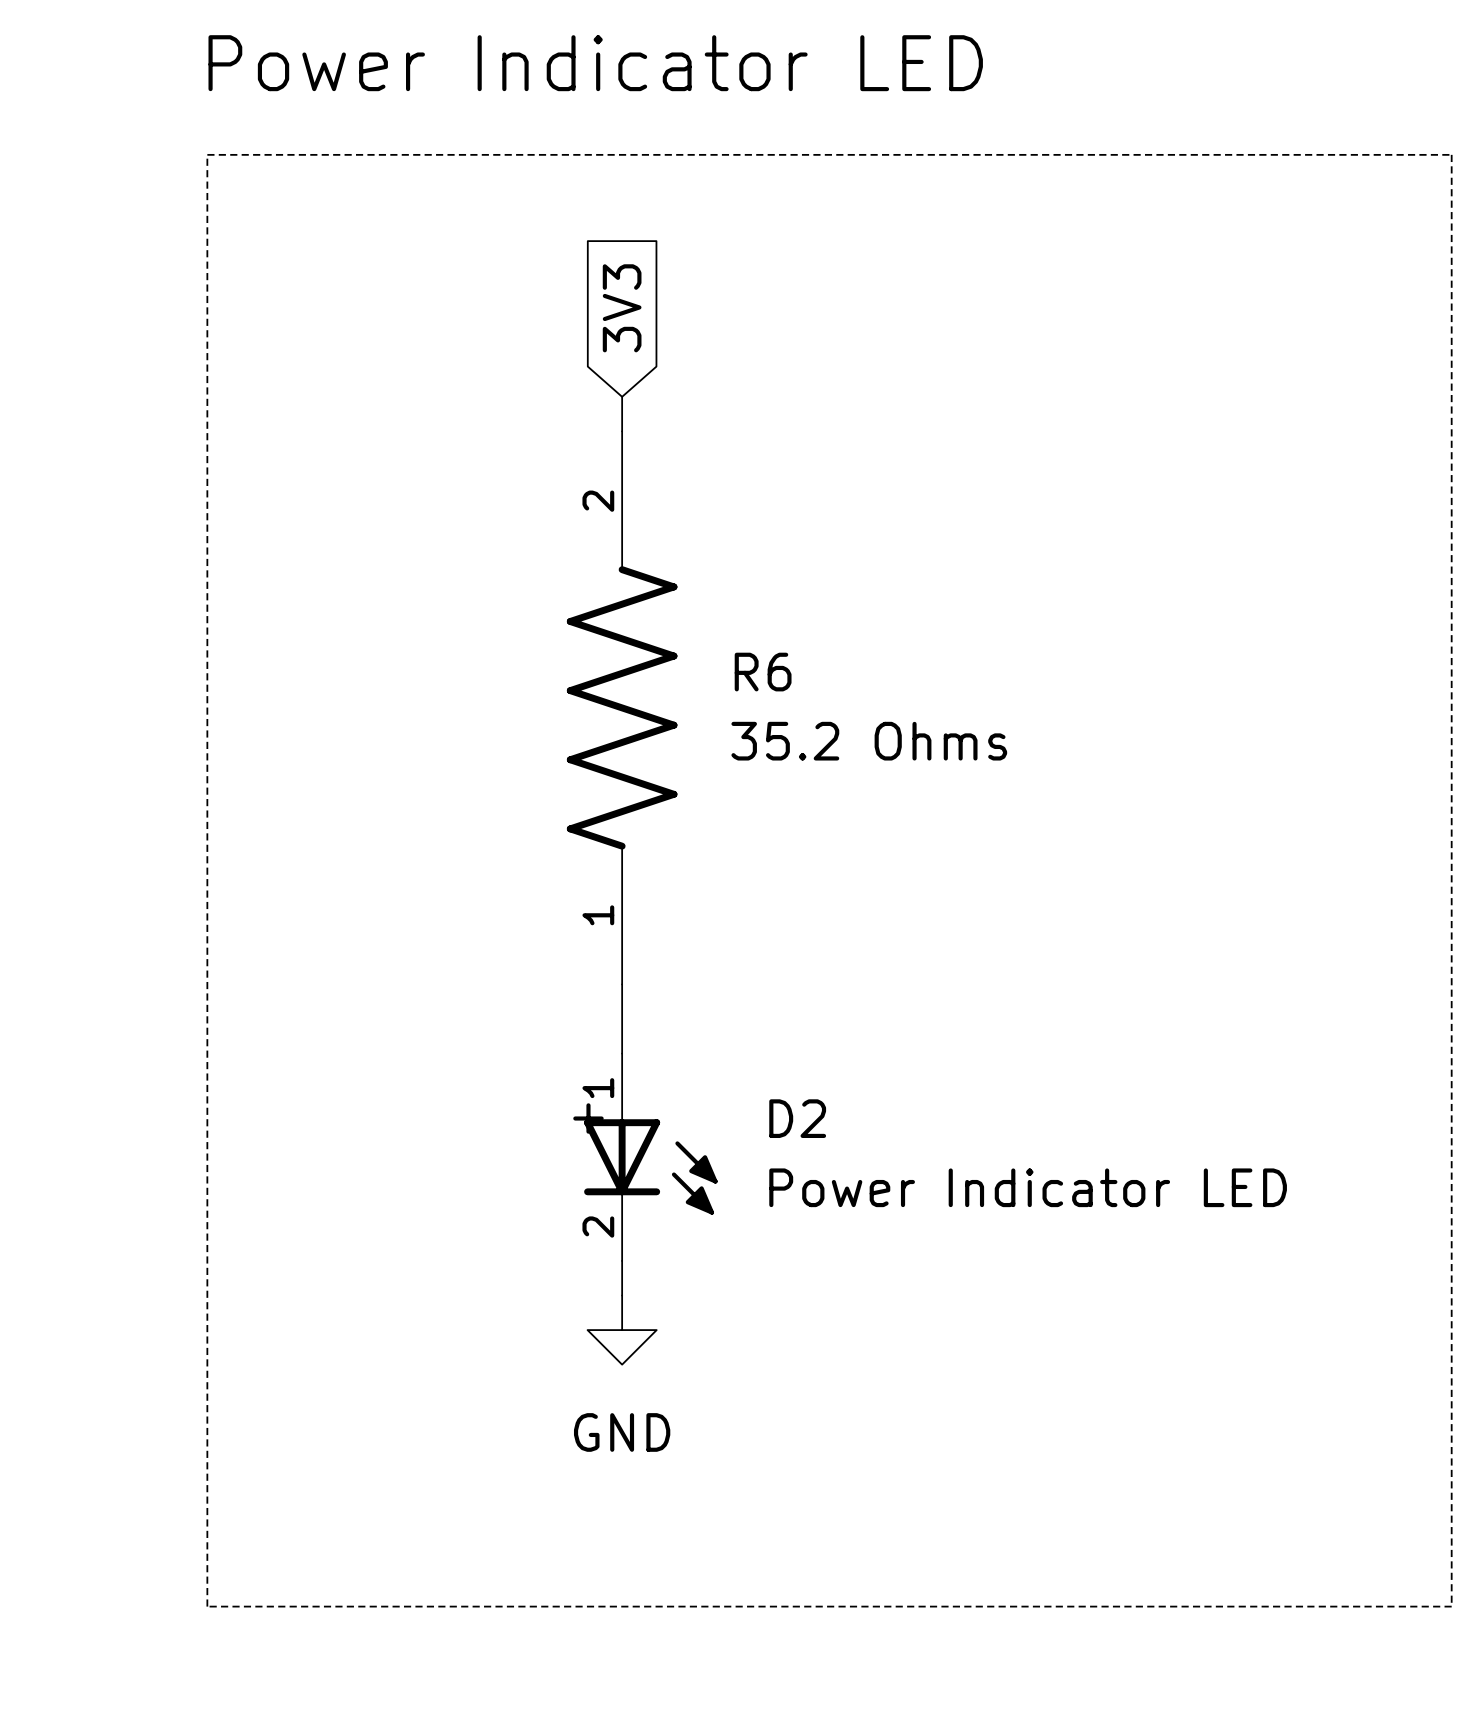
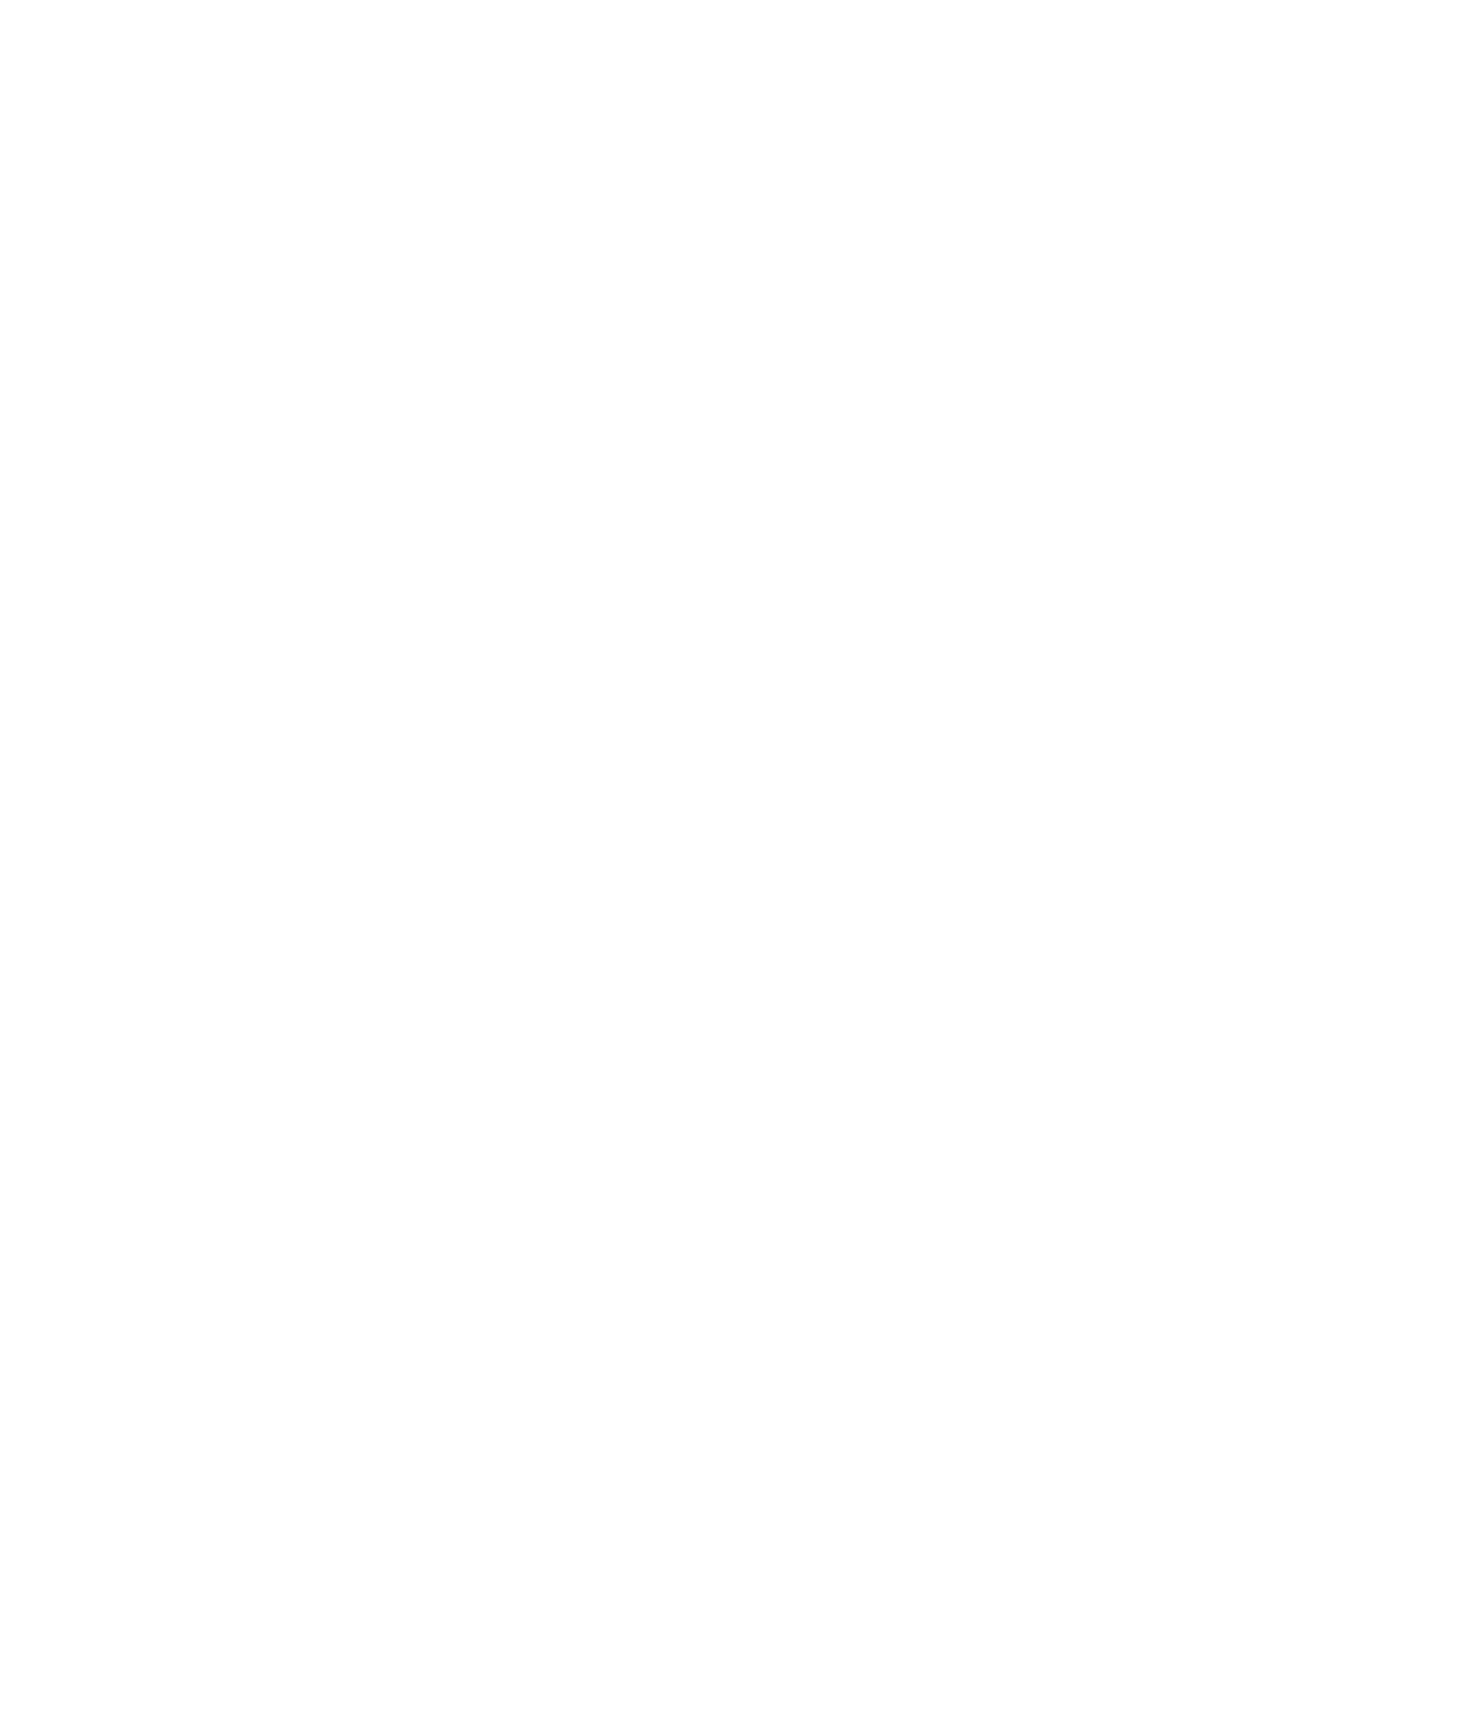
text: Power Indicator LED (595, 63) -> none
line: (207, 154) (1451, 154) (1451, 1606) (207, 1606) (207, 154) -> none
global label: 3V3 (622, 308) -> none
wire: (622, 396) (622, 431) -> none
R6: 35.2 Ohms (622, 707) -> none
wire: (622, 984) (622, 1053) -> none
D2: Power Indicator LED (650, 1157) -> none
wire: (622, 1260) (622, 1295) -> none
power symbol: GND (622, 1330) -> none

